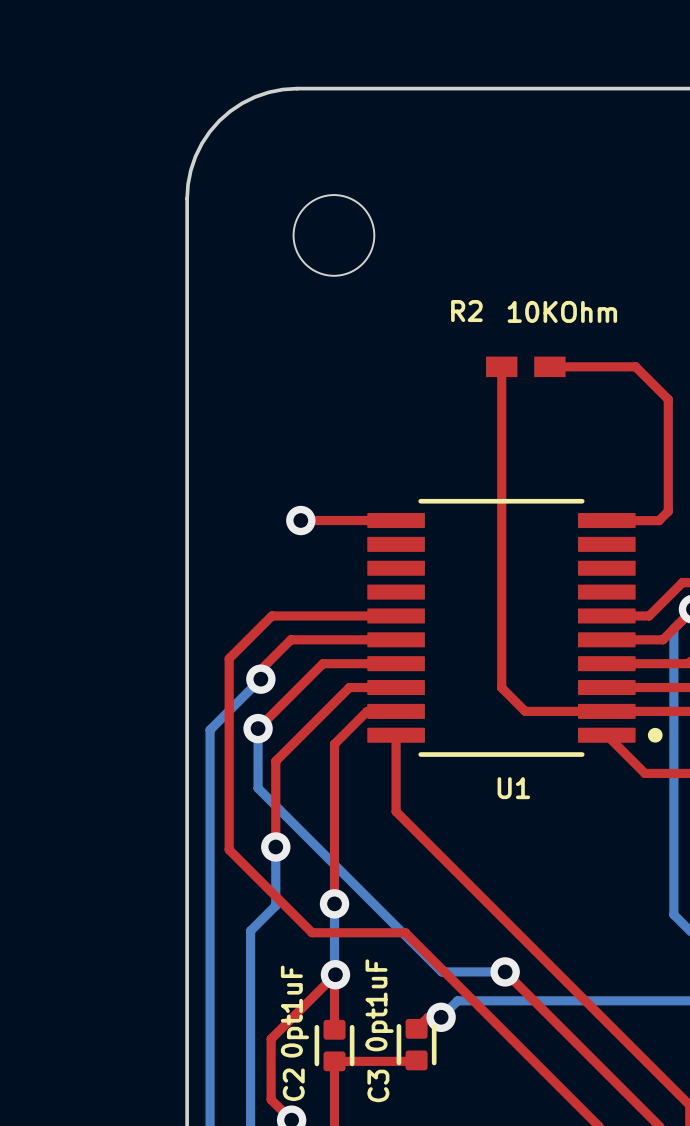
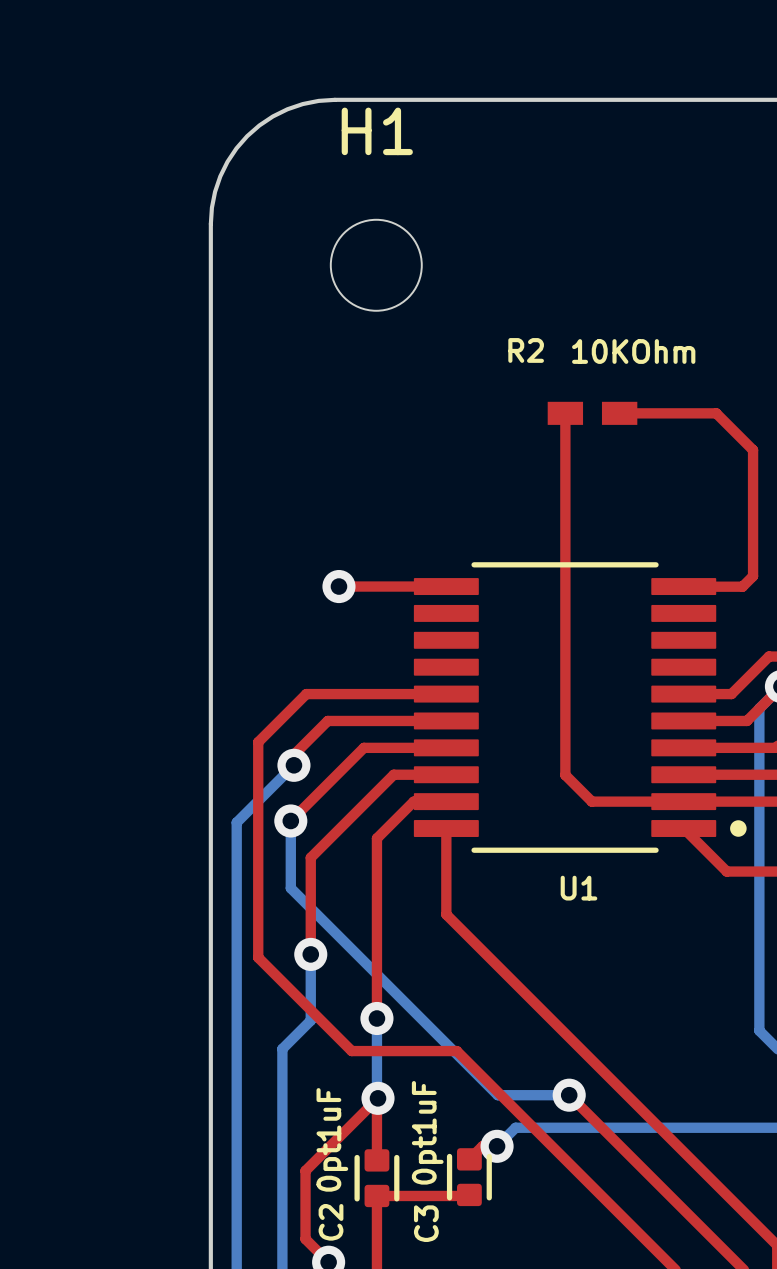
H1 name: none -> H1 (377, 131)

